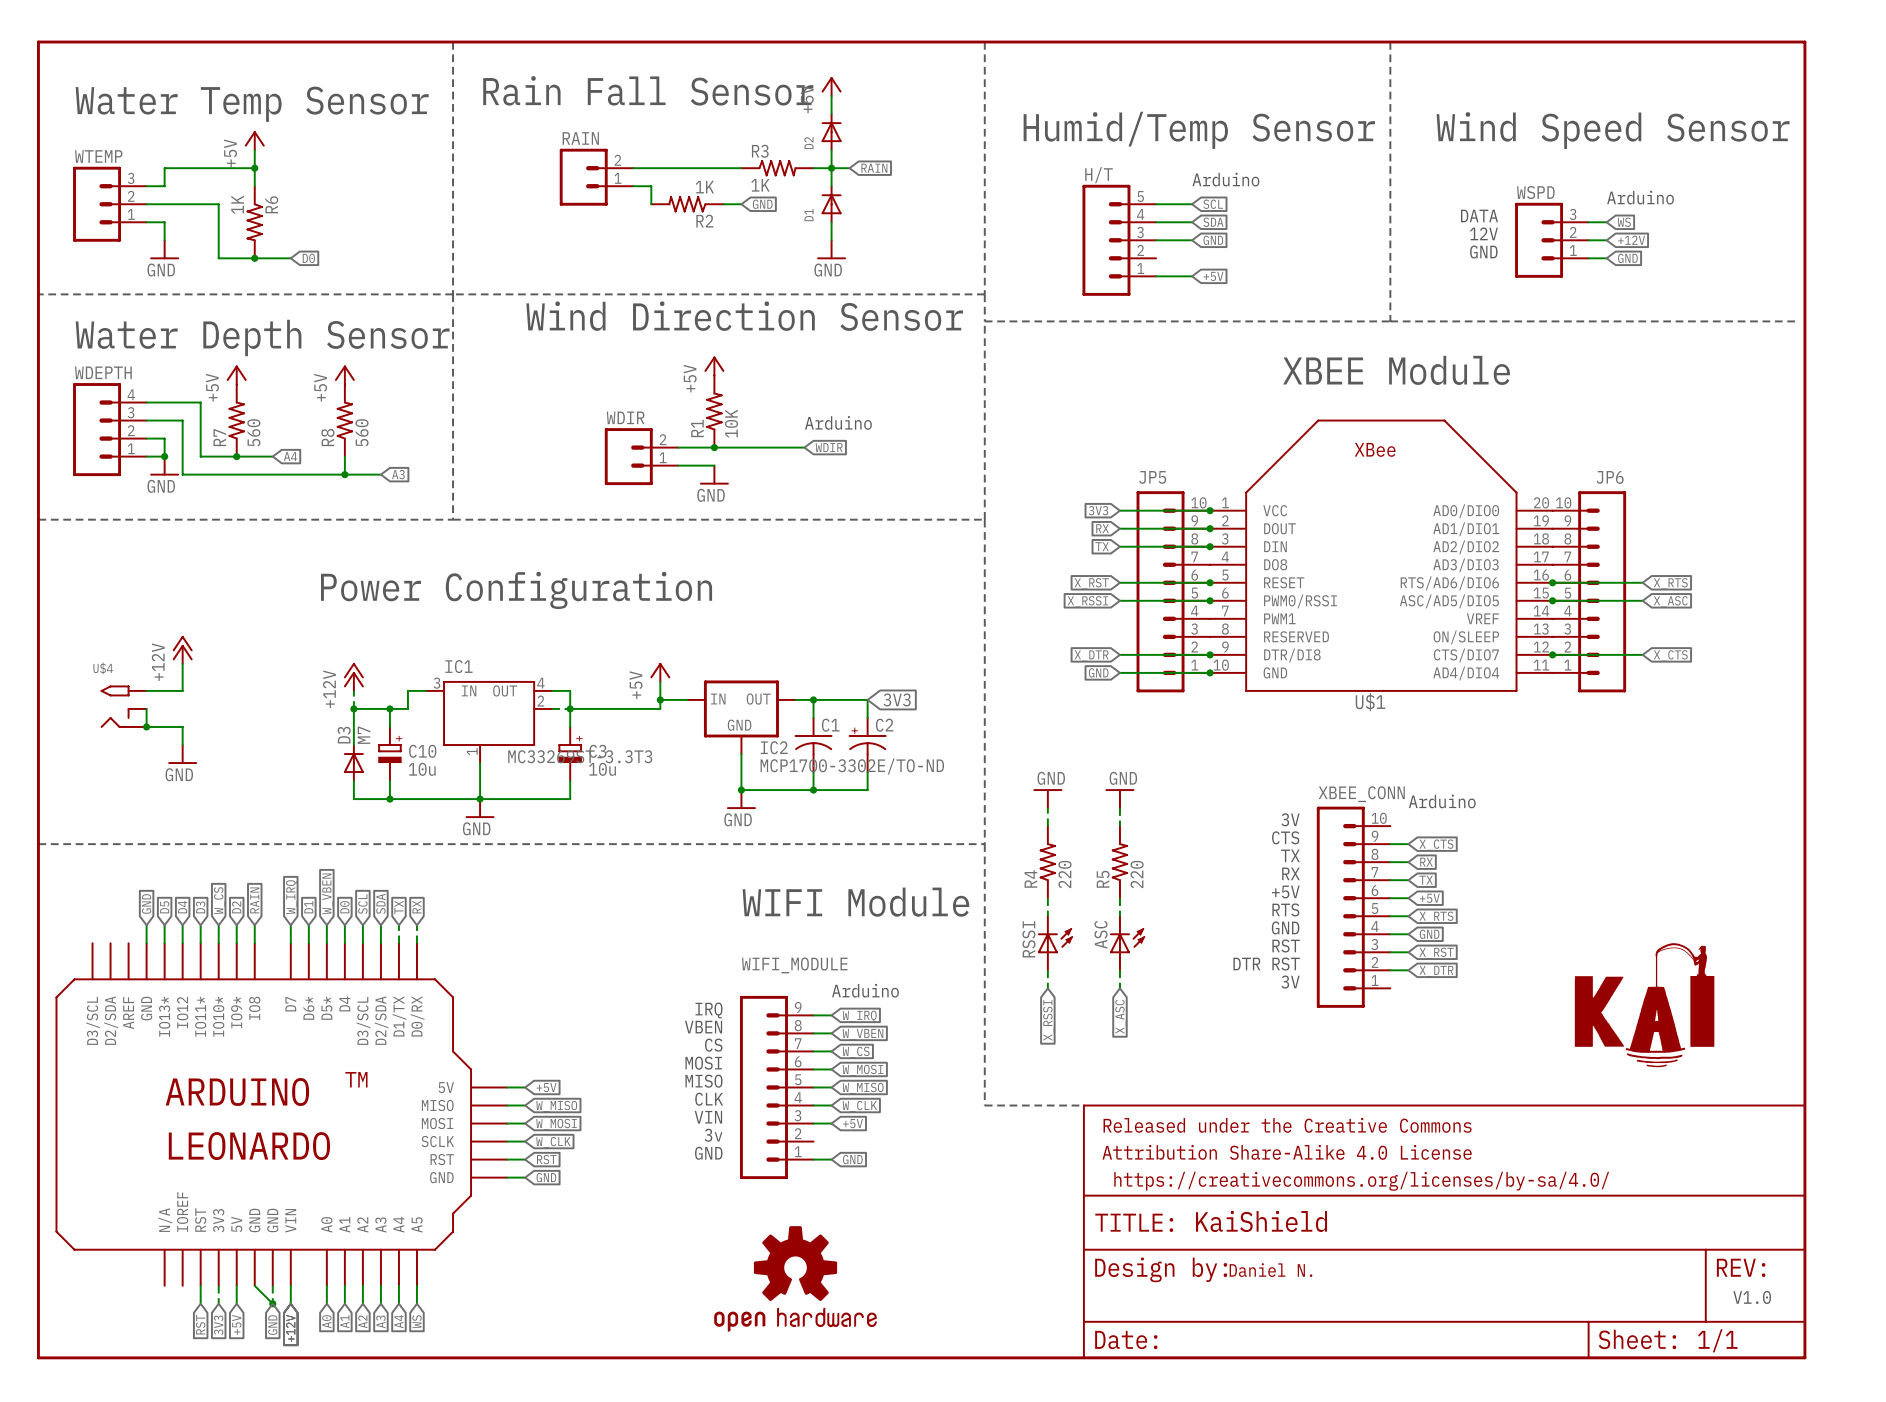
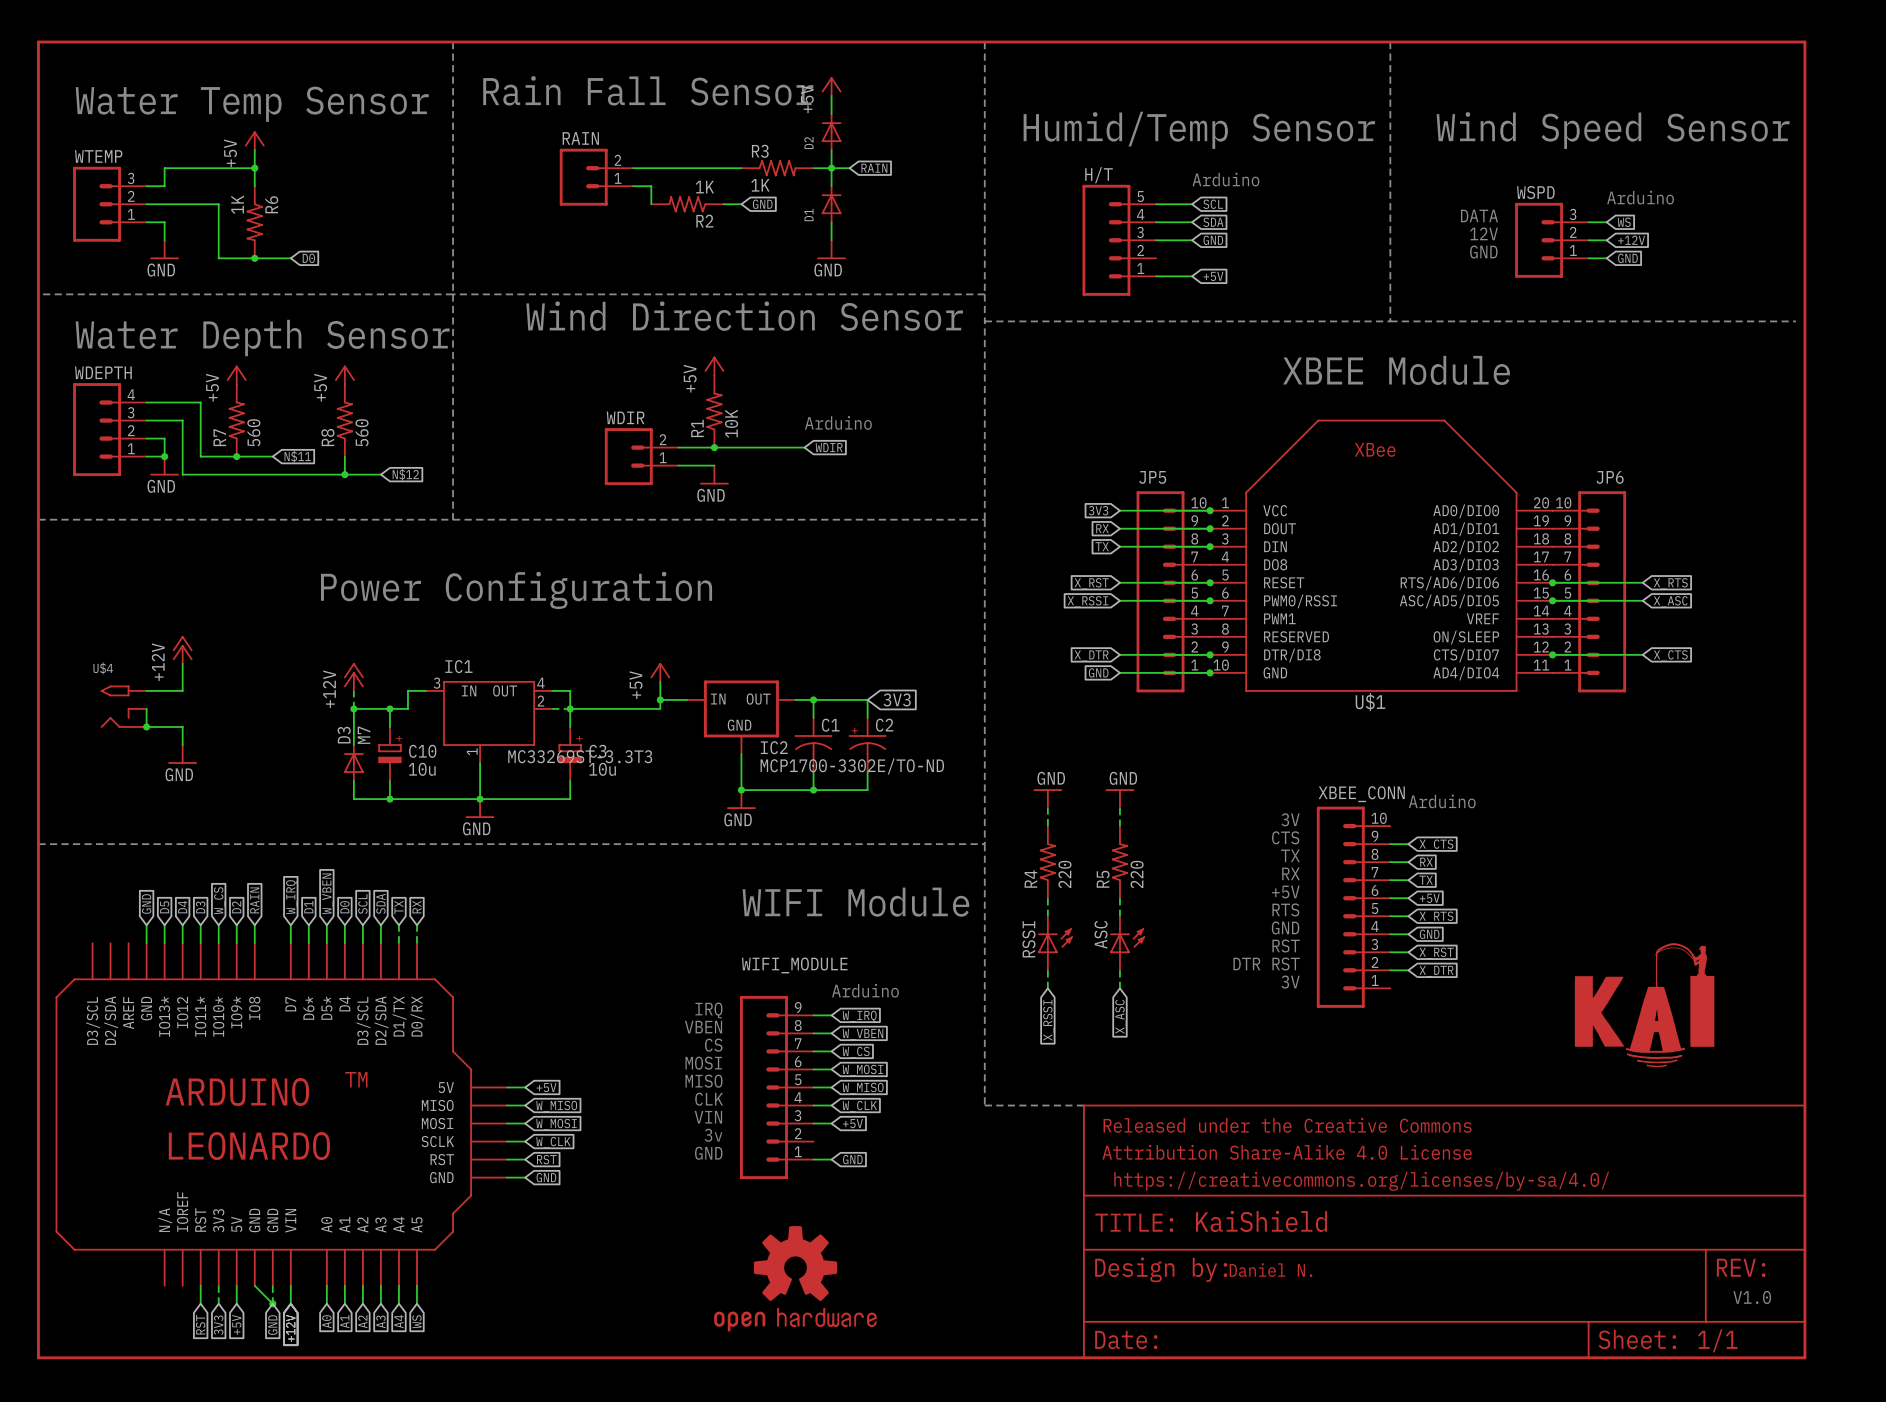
global label: A4 (290, 456) -> N$11 (297, 456)
global label: A3 (398, 474) -> N$12 (405, 474)

